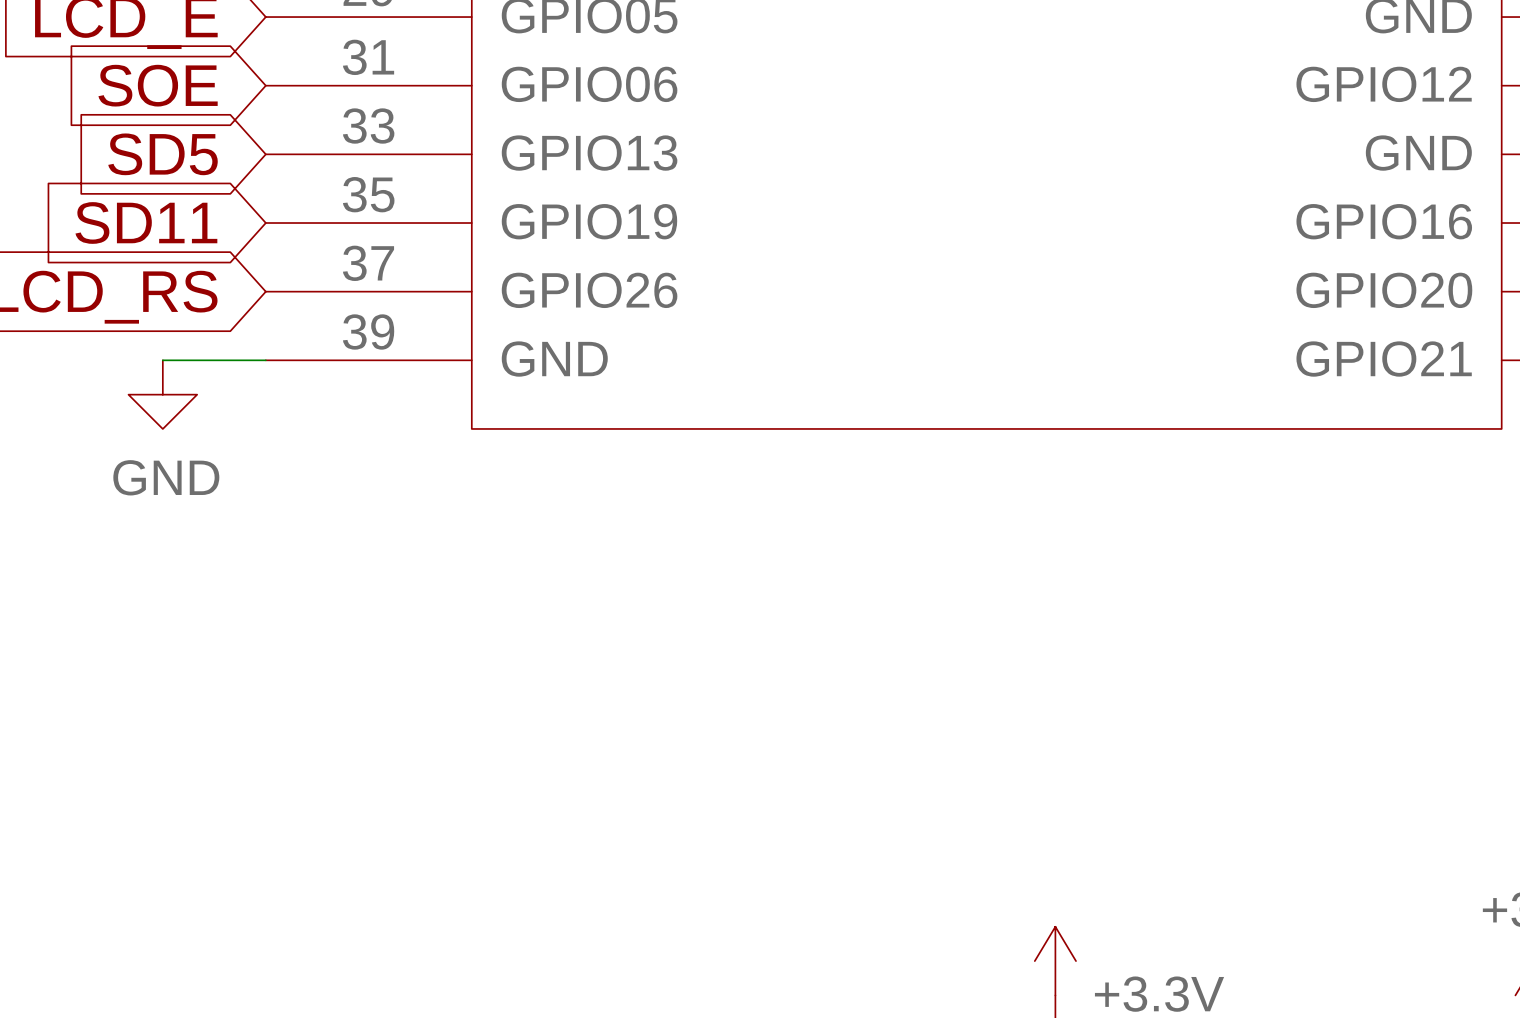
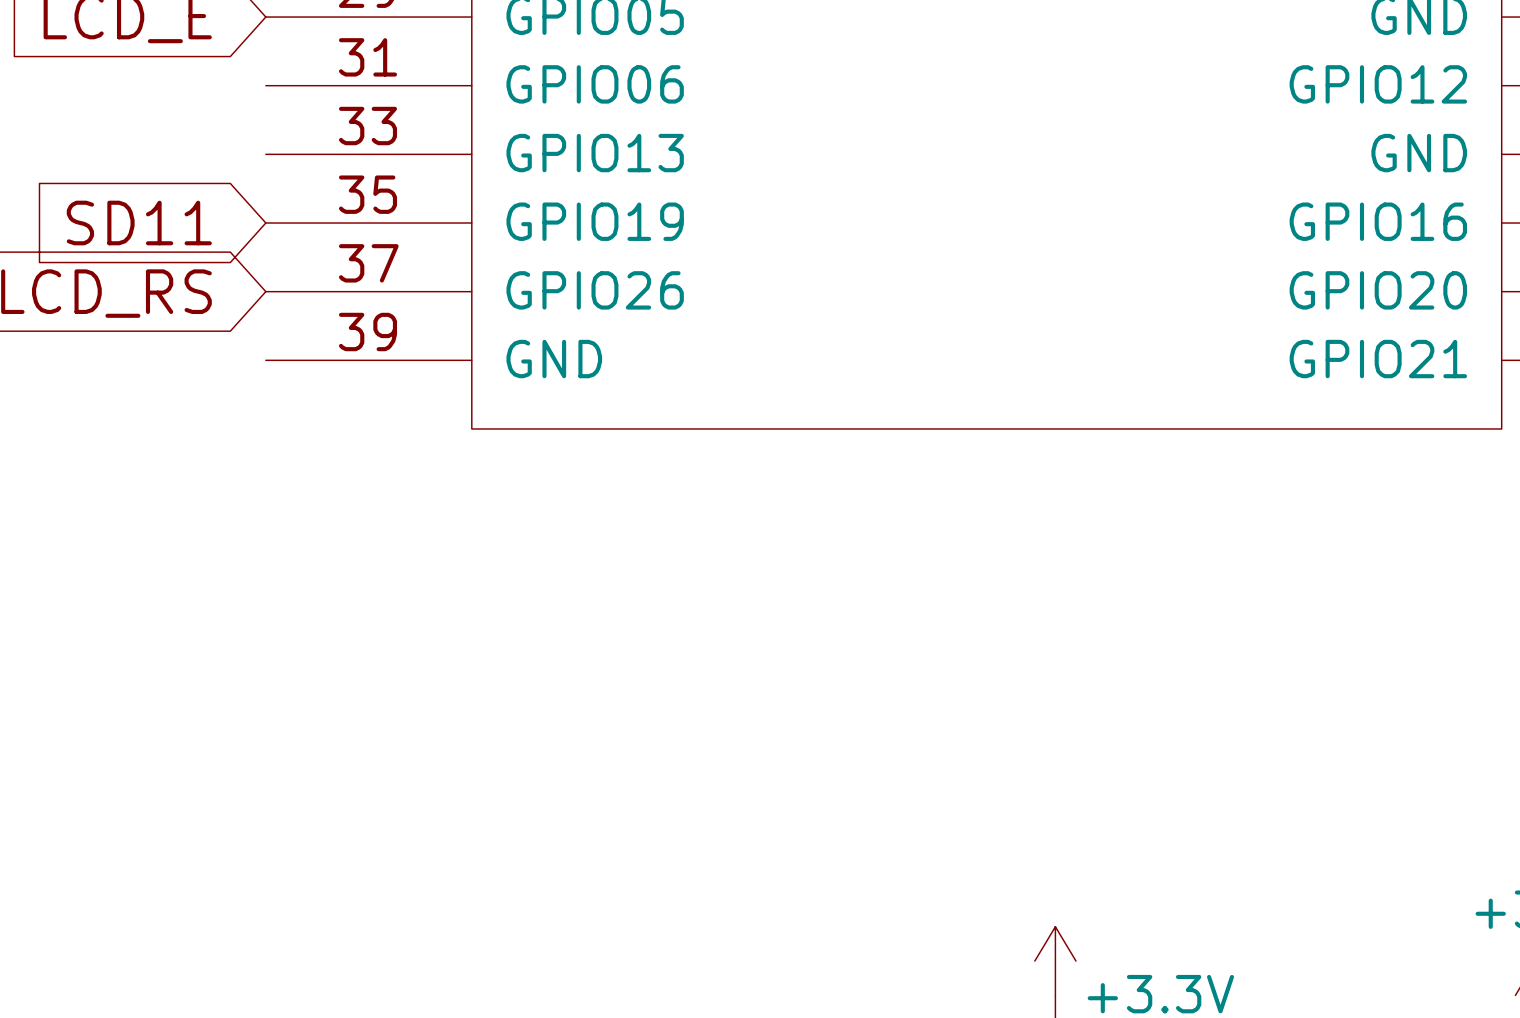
global label: SOE (158, 85) -> none
global label: SD5 (162, 154) -> none
wire: (162, 360) (265, 360) -> none
power symbol: GND (162, 394) -> none

